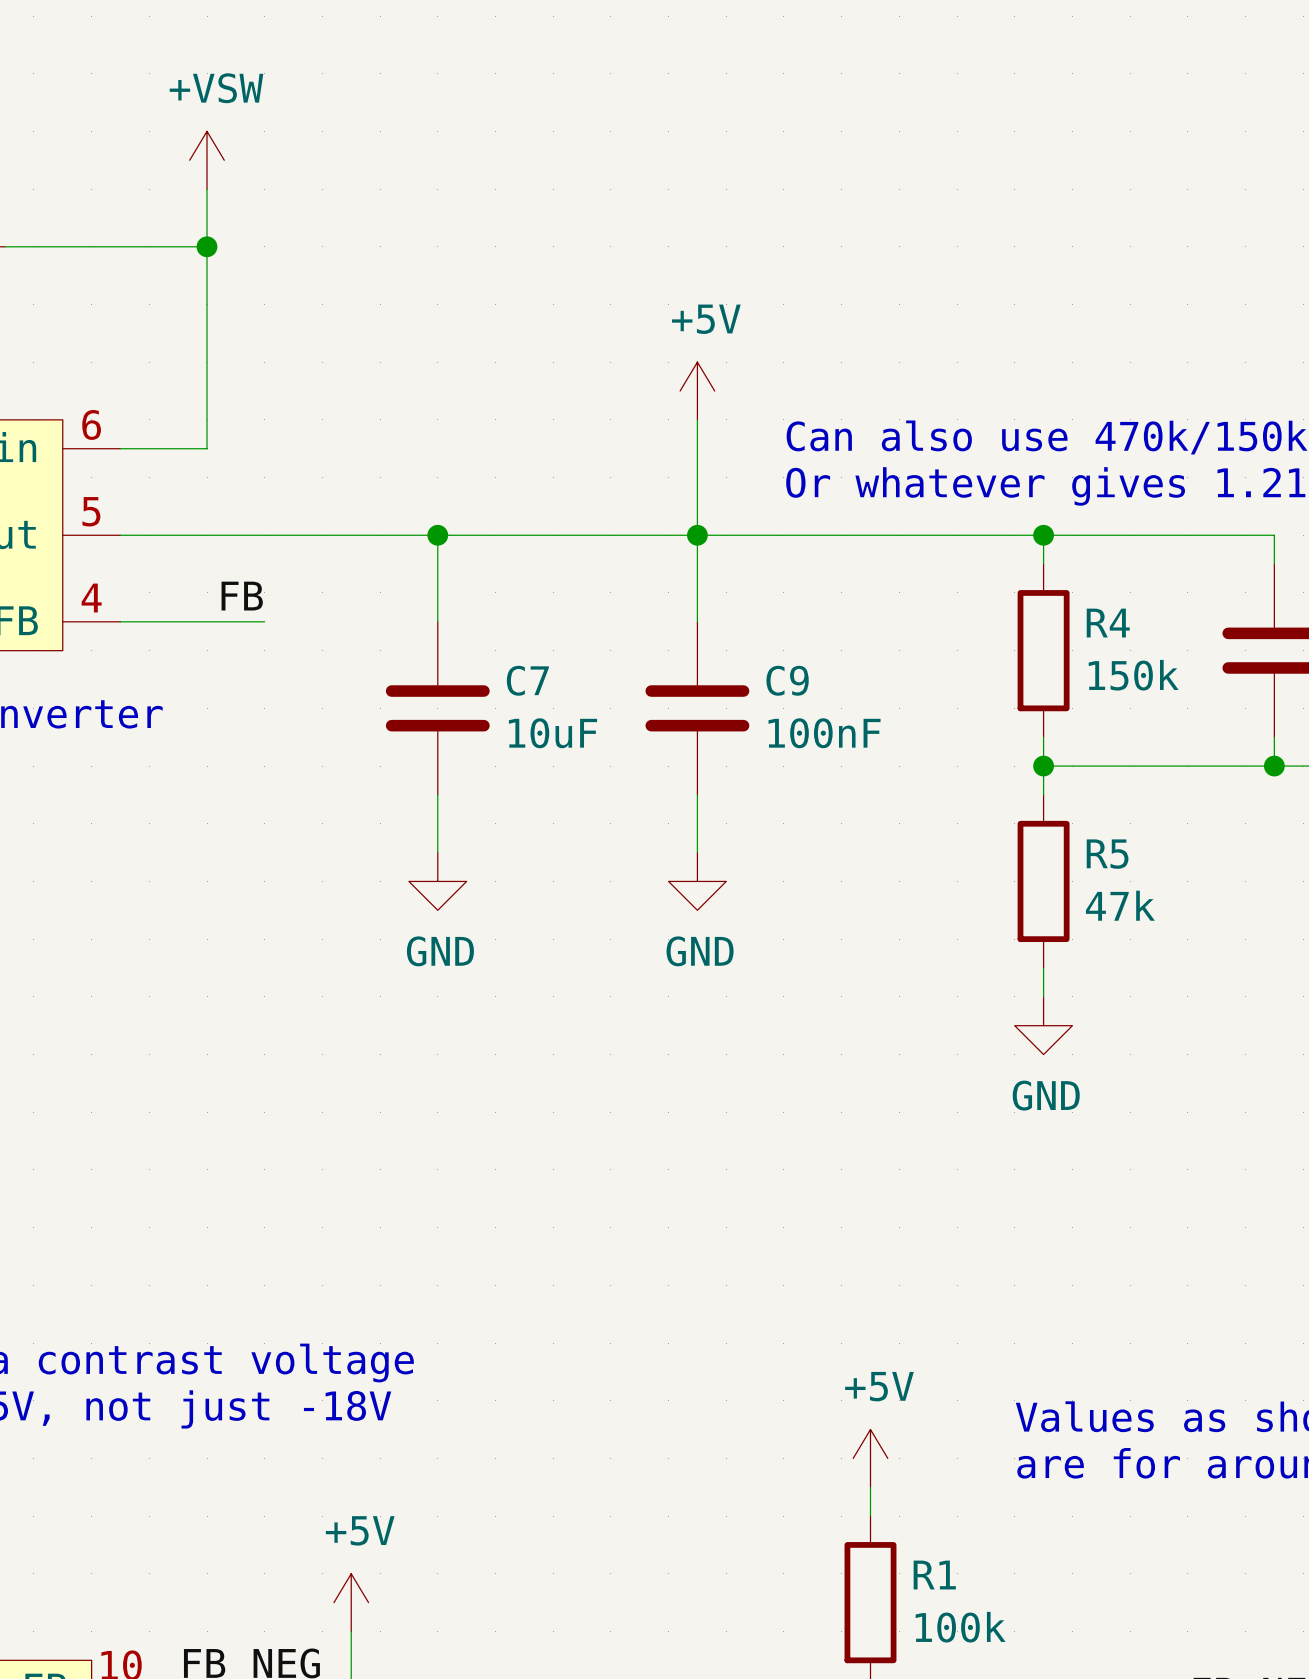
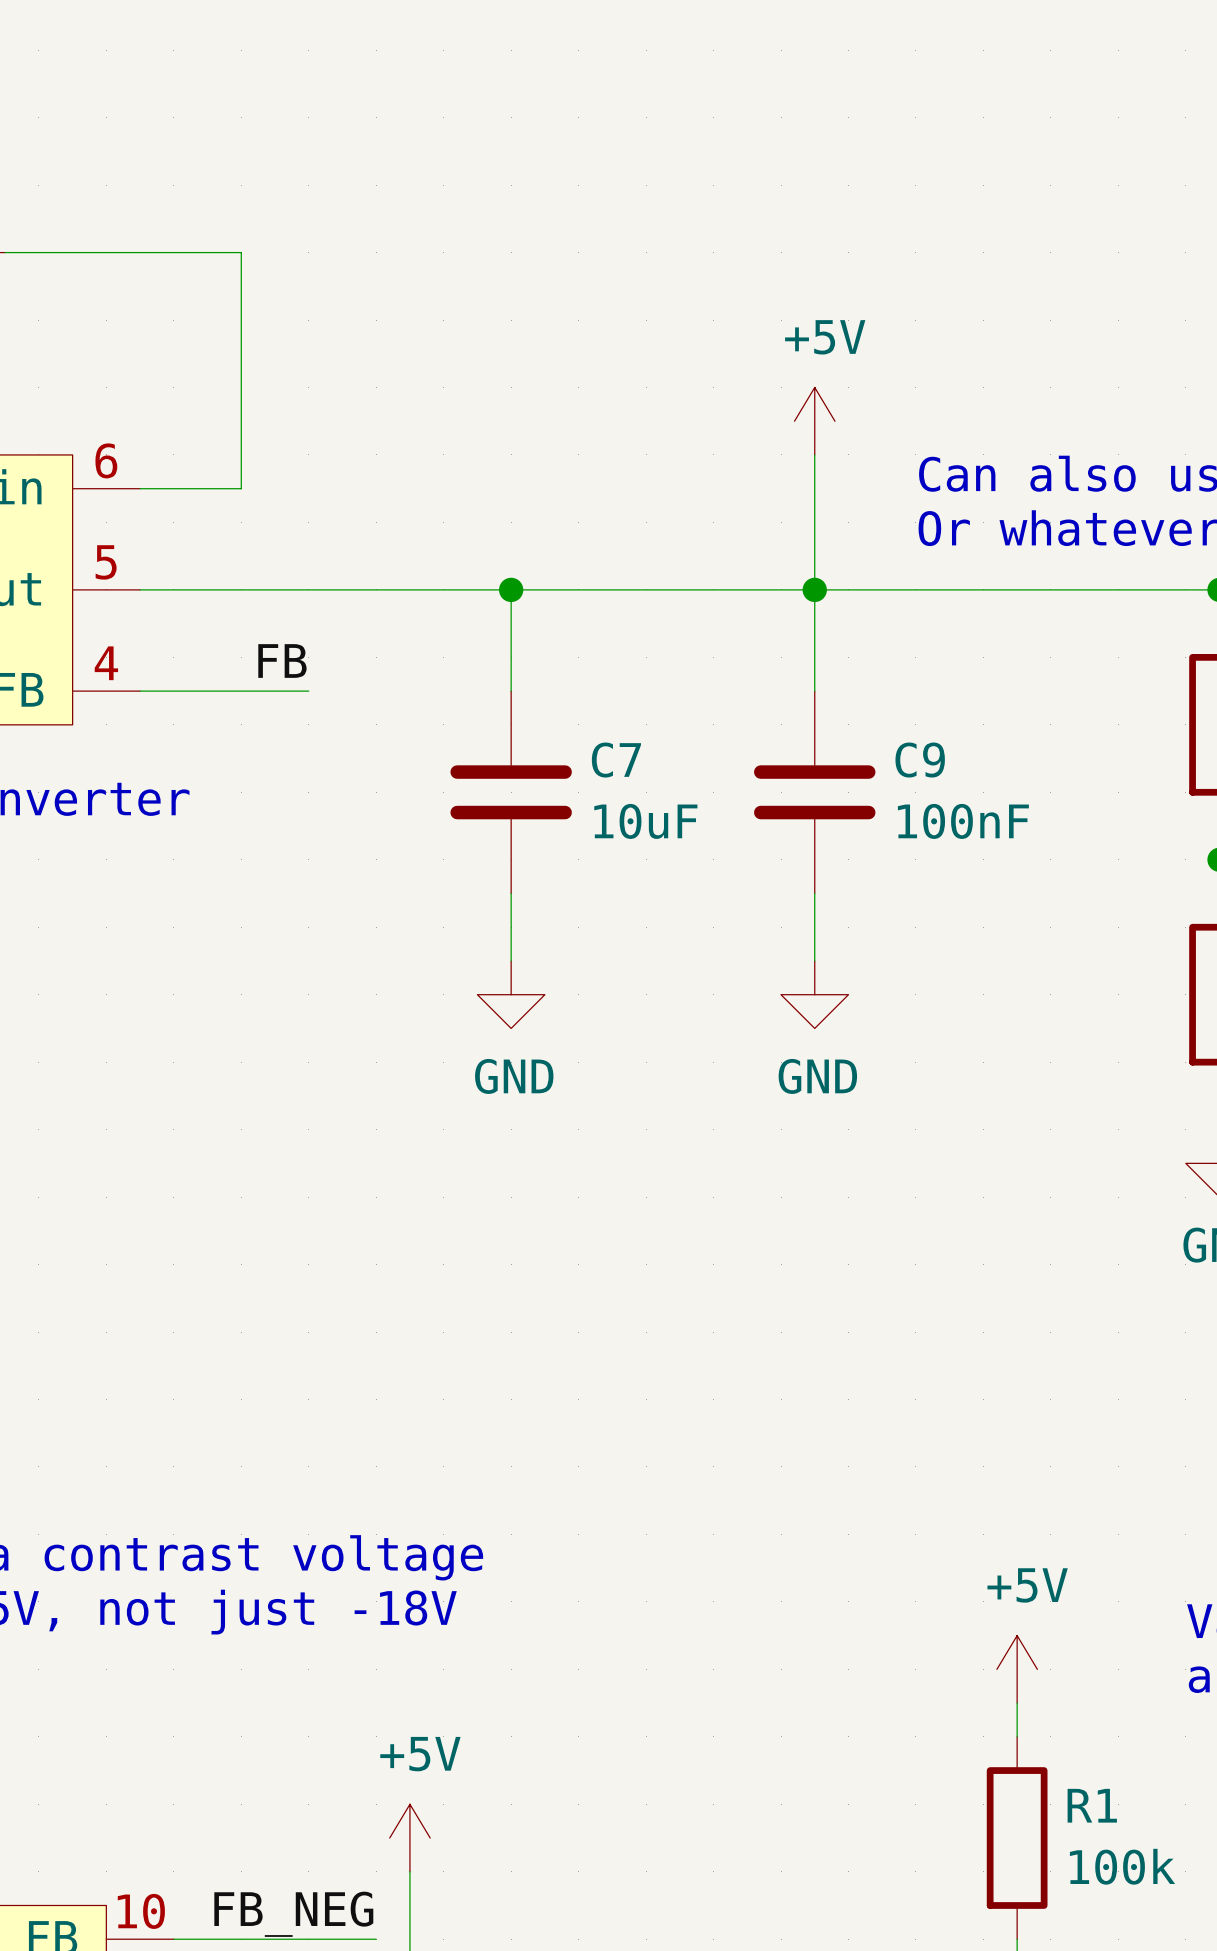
power symbol: +VSW (207, 160) -> none
wire: (207, 189) (207, 246) -> none
junction: (207, 246) -> none

